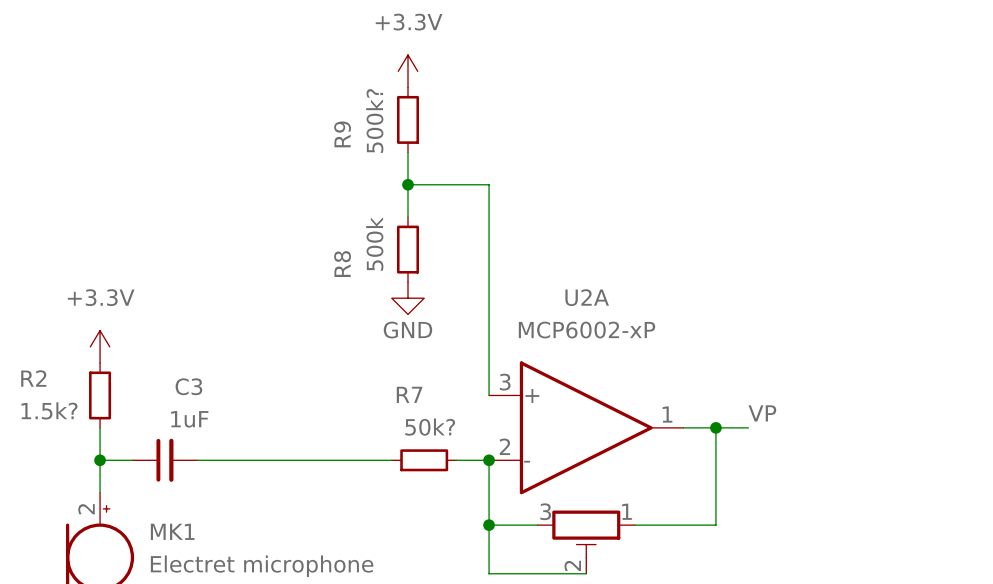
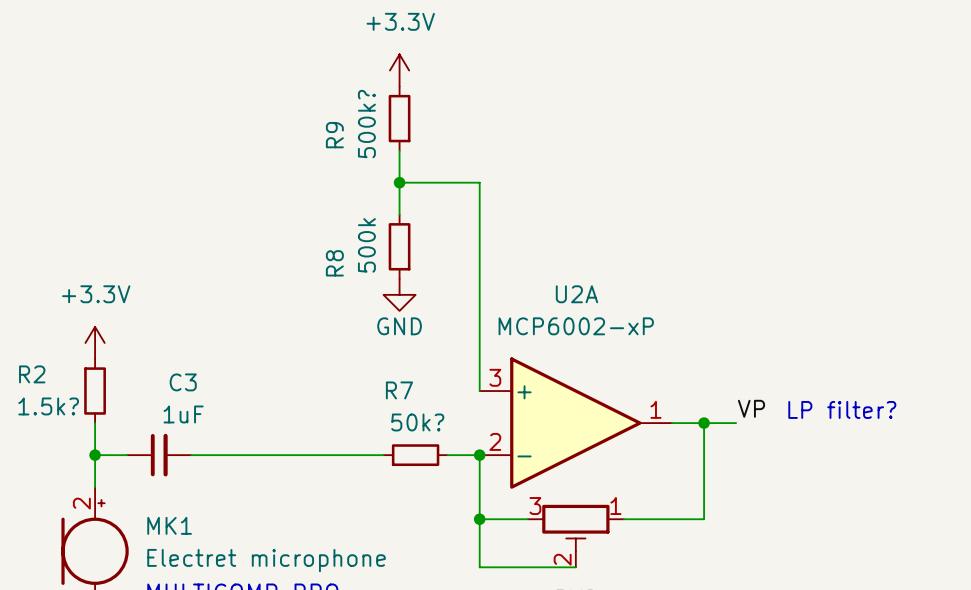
text: none -> LP filter? (842, 409)

